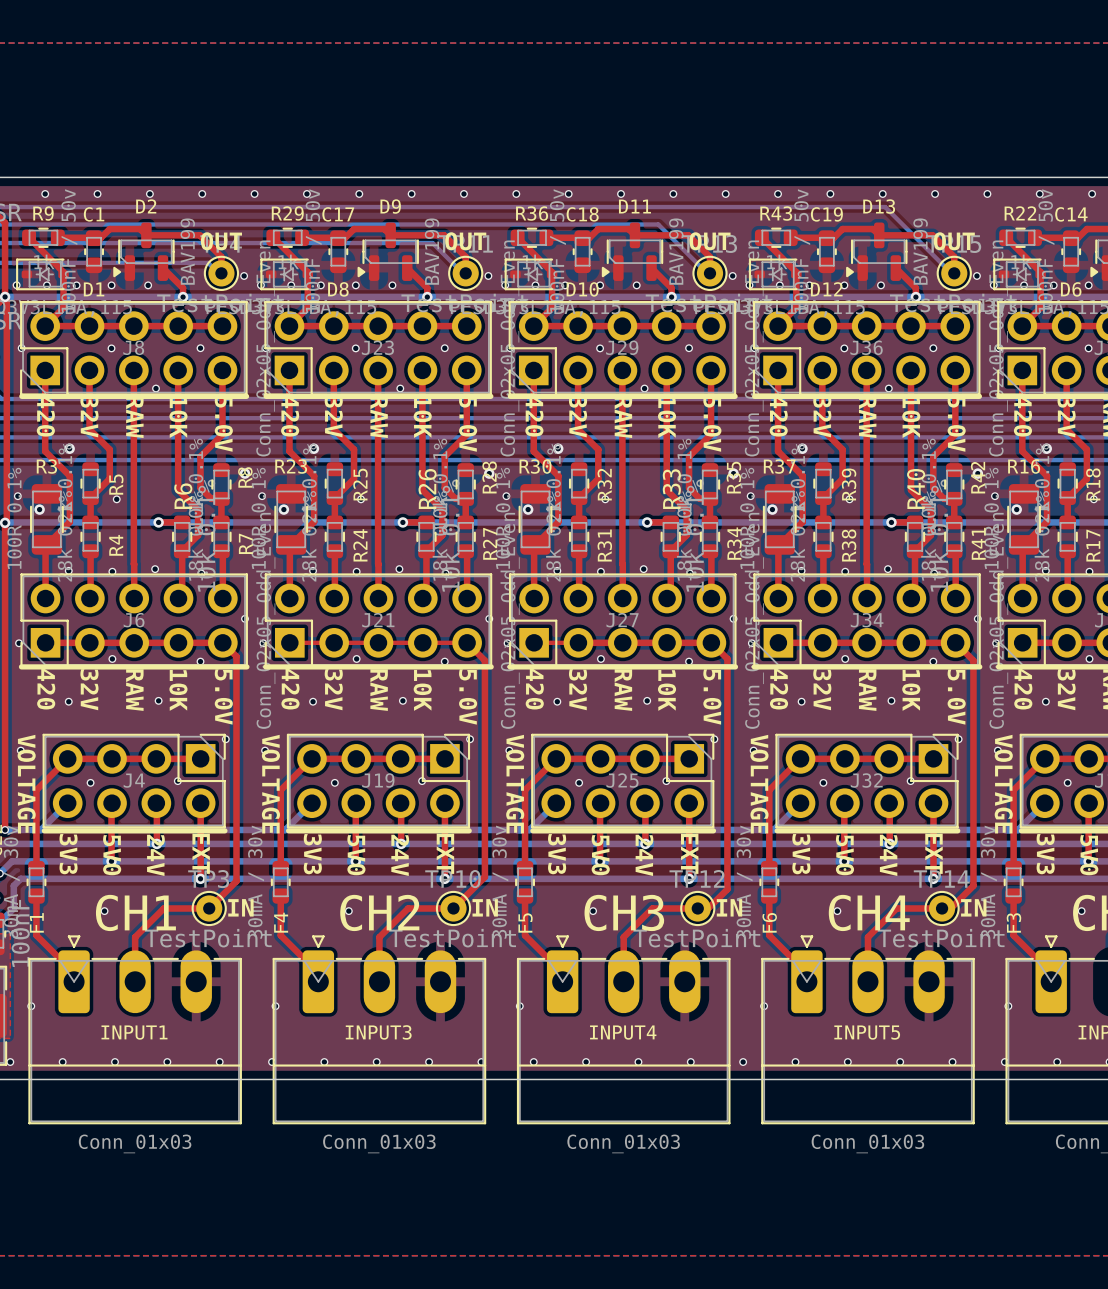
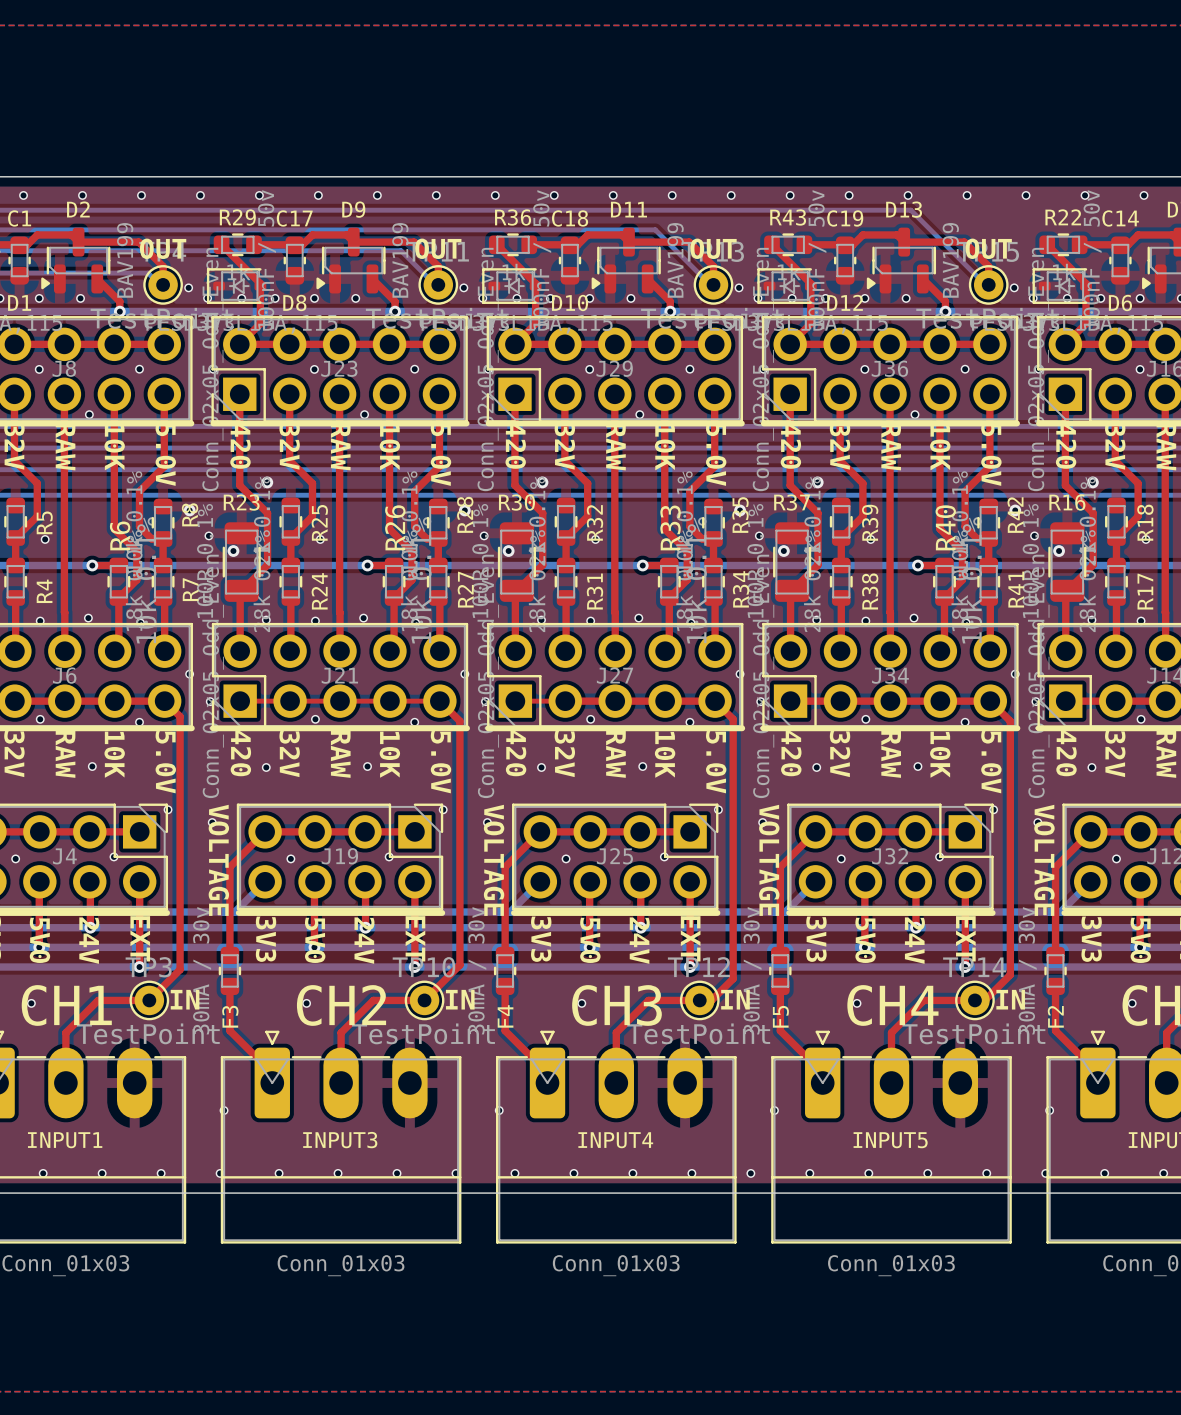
F4 name: F4 (281, 922) -> F3 (230, 1016)
F5 name: F5 (525, 922) -> F4 (505, 1016)
F6 name: F6 (769, 922) -> F5 (780, 1016)
F3 name: F3 (1013, 922) -> F2 (1055, 1016)

